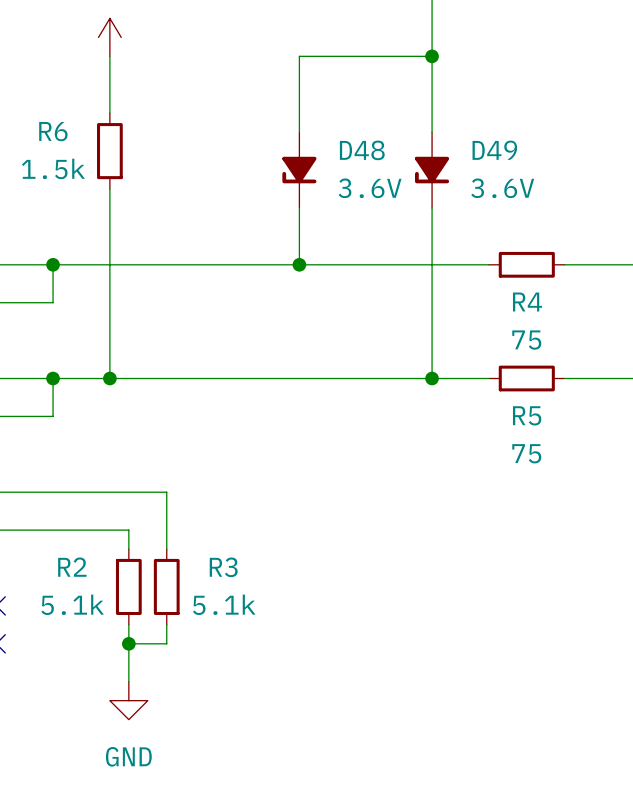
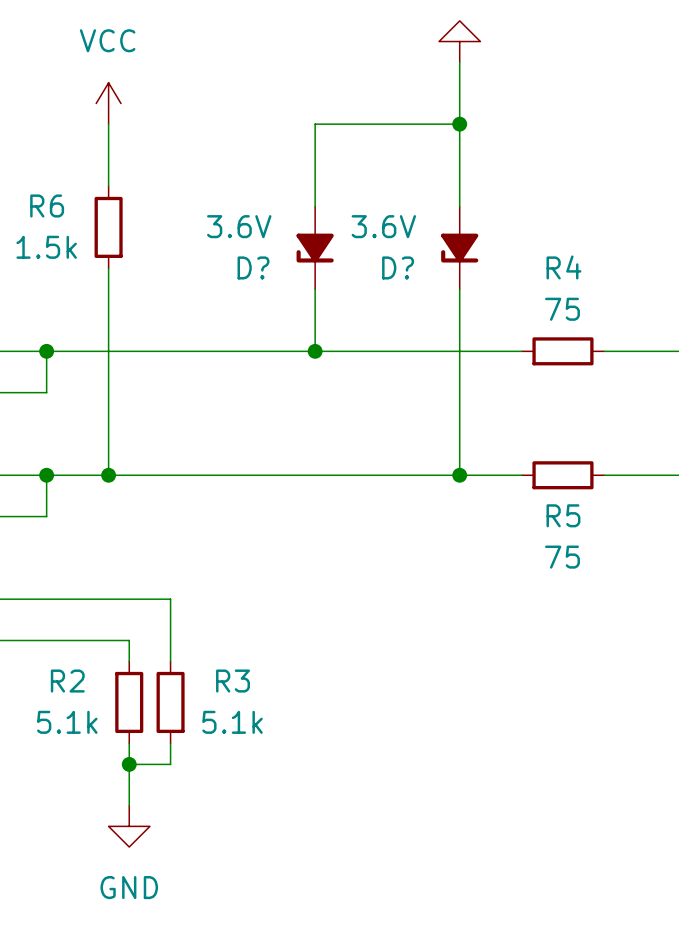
D48 name: D48 (362, 150) -> D? (253, 267)
D49 name: D49 (494, 150) -> D? (398, 267)
D48 value position: 3.6V (370, 188) -> 3.6V (239, 226)
D49 value position: 3.6V (502, 188) -> 3.6V (383, 226)
R4 name position: R4 (527, 301) -> R4 (563, 267)
R4 value position: 75 (526, 340) -> 75 (562, 309)

